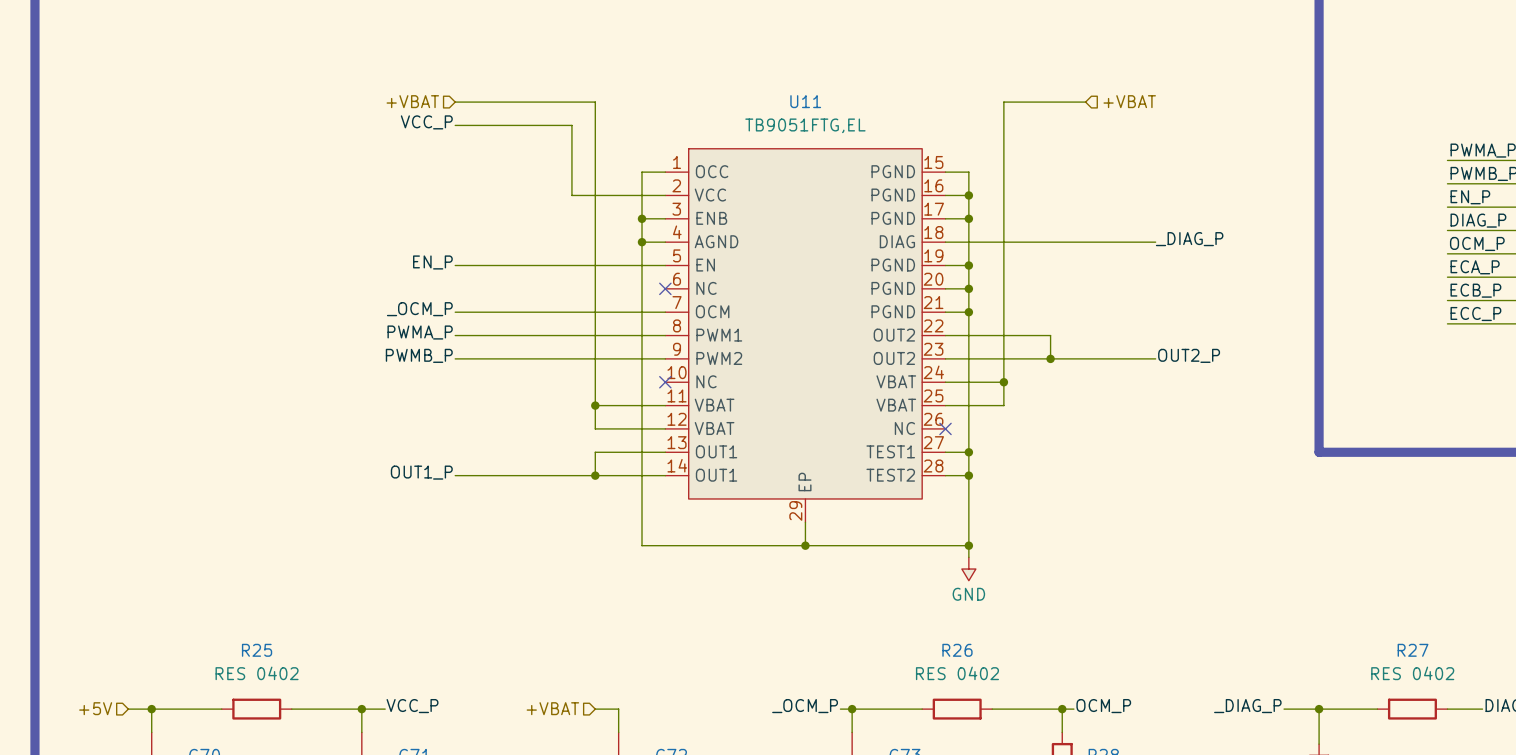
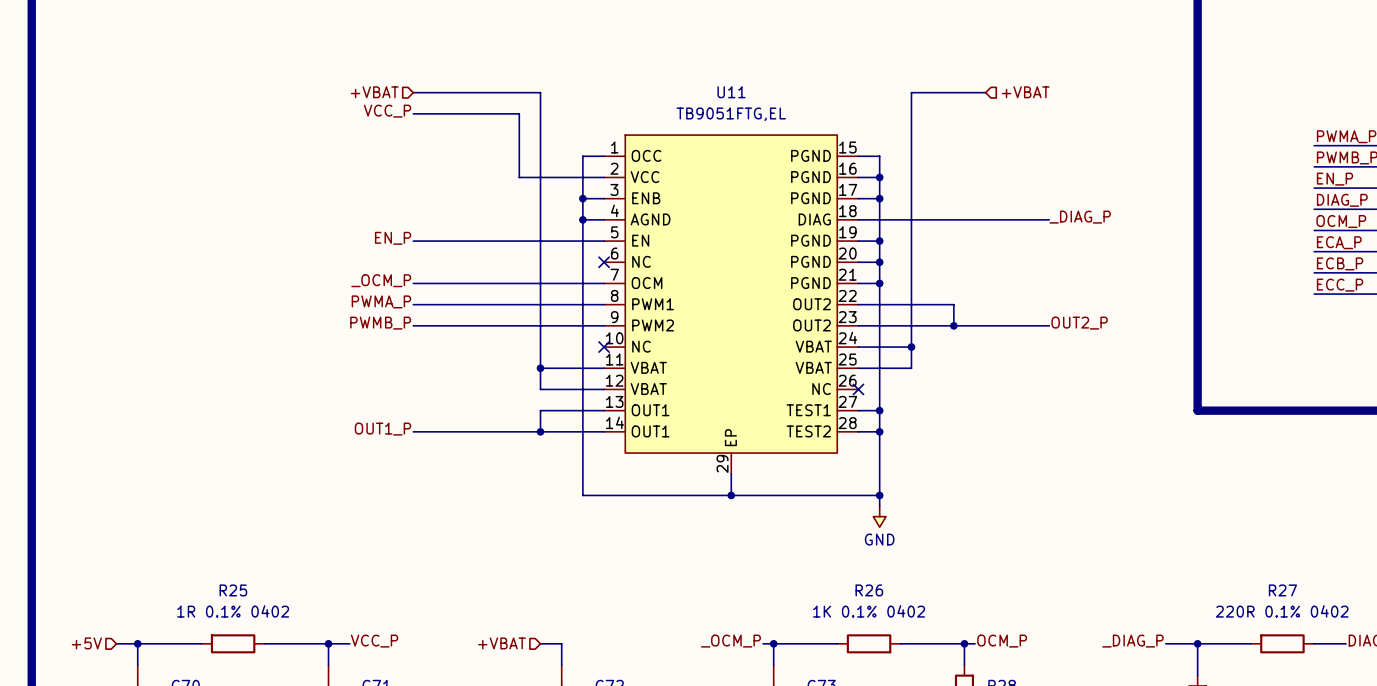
R25 value: RES 0402 (257, 673) -> 1R 0.1% 0402 (233, 611)
R26 value: RES 0402 (957, 673) -> 1K 0.1% 0402 (869, 611)
R27 value: RES 0402 (1412, 673) -> 220R 0.1% 0402 (1282, 611)

